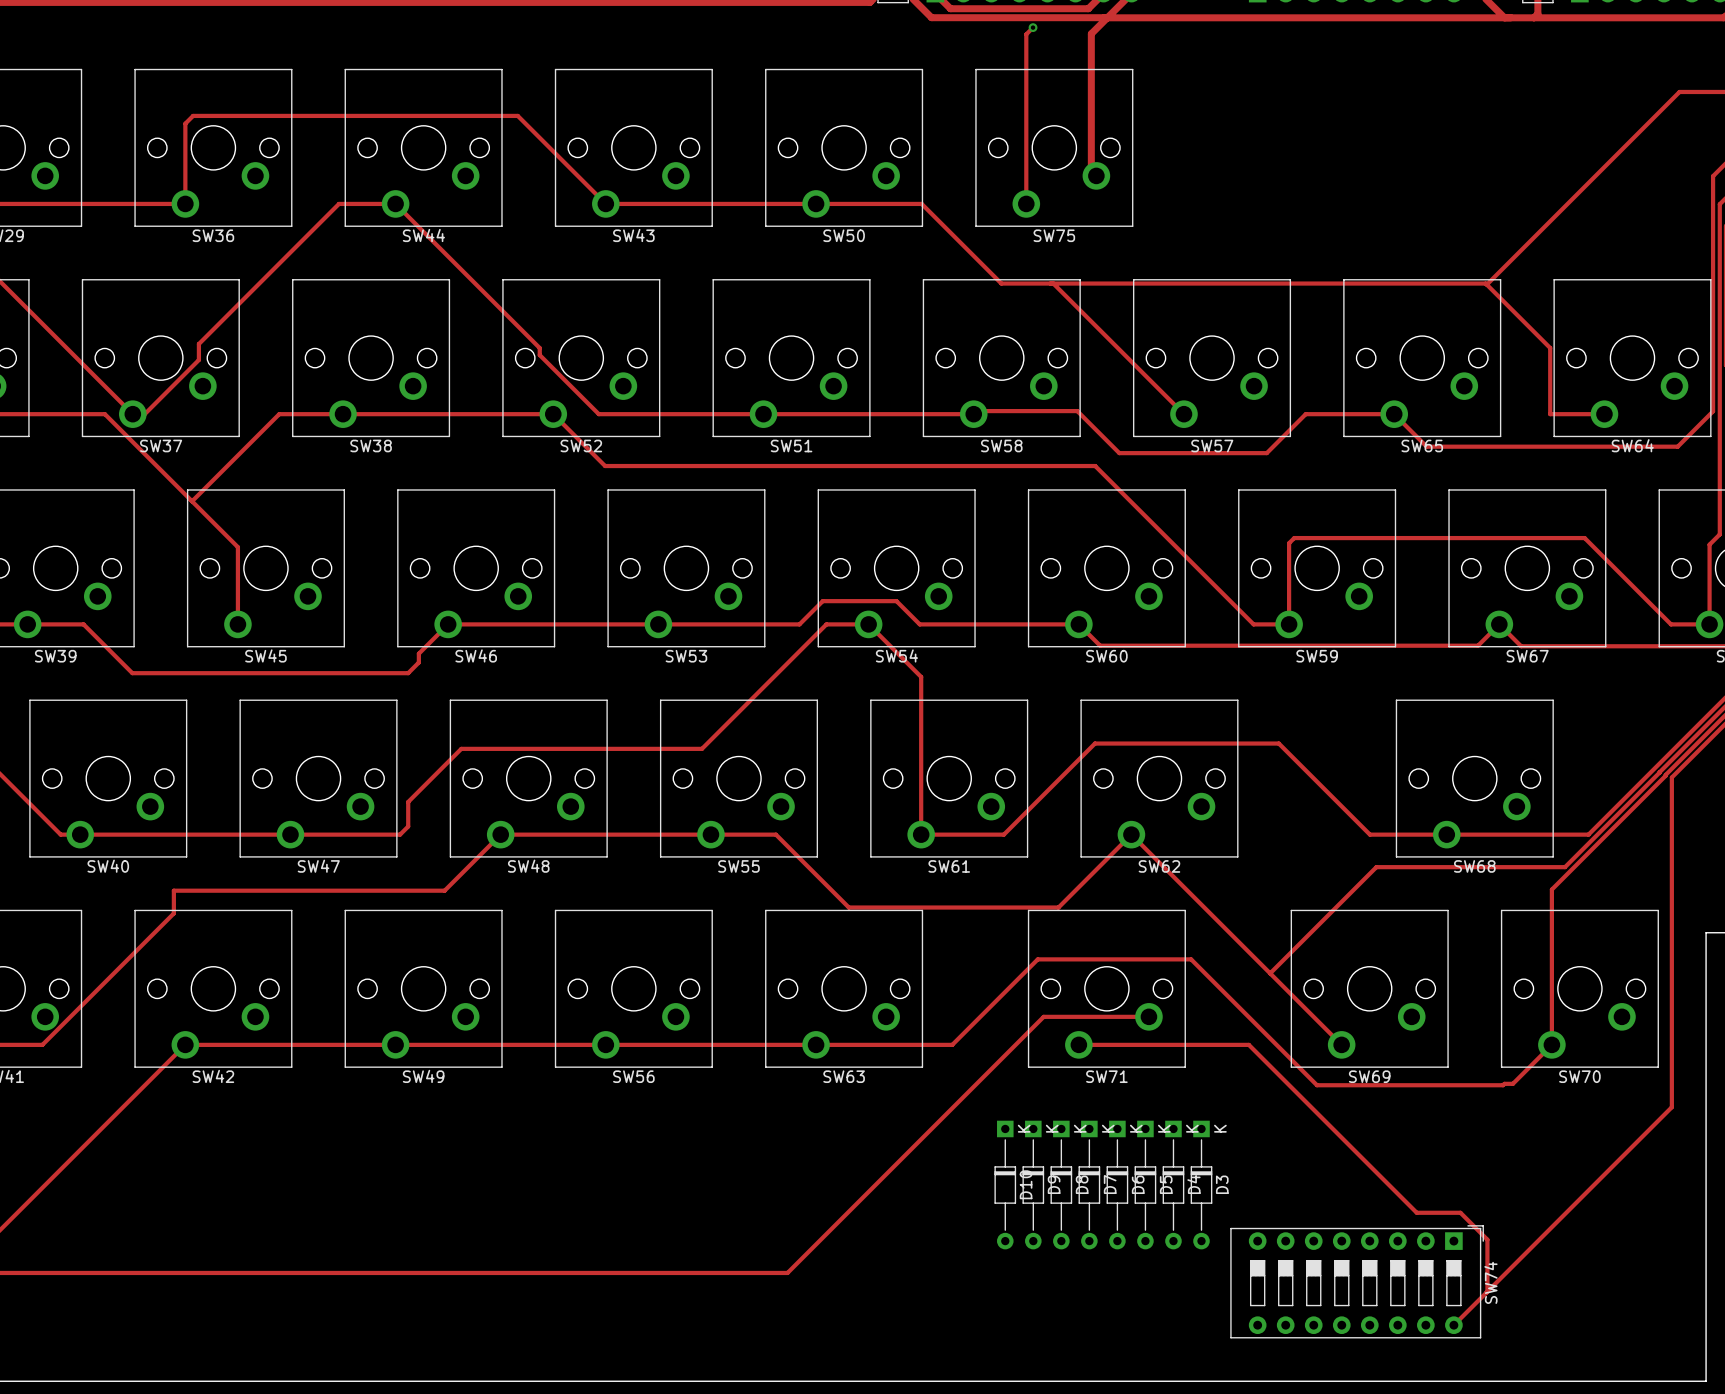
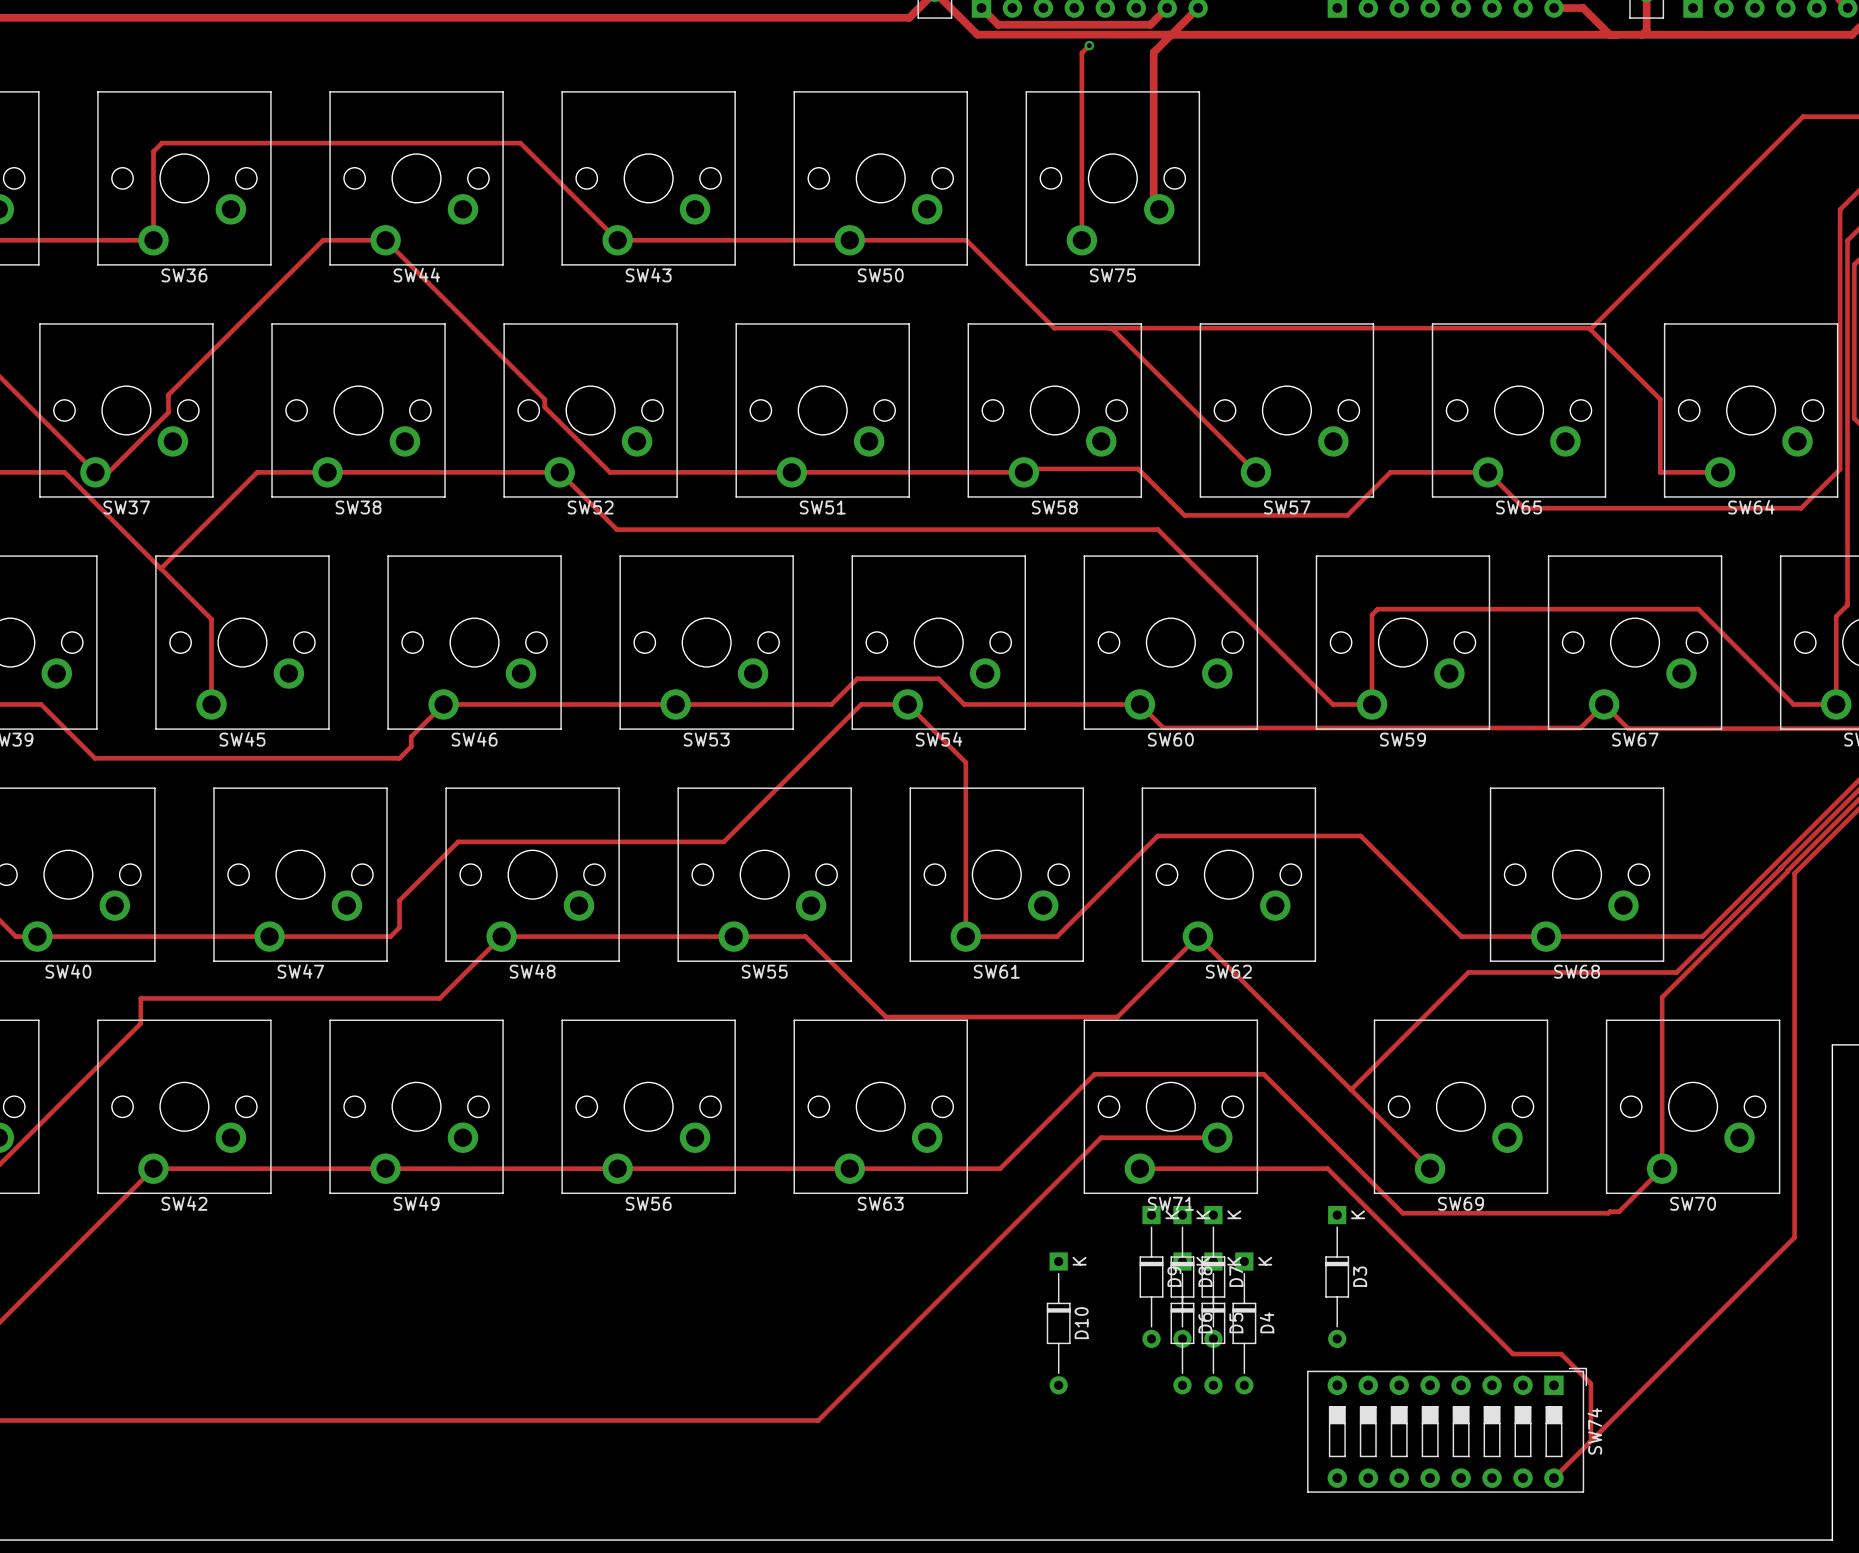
D3 footprint: [1190, 1120, 1213, 1250] -> [1325, 1205, 1350, 1349]
D9 position: (1033, 1185) -> (1151, 1276)
D8 position: (1061, 1185) -> (1182, 1276)
D7 position: (1089, 1185) -> (1213, 1276)

